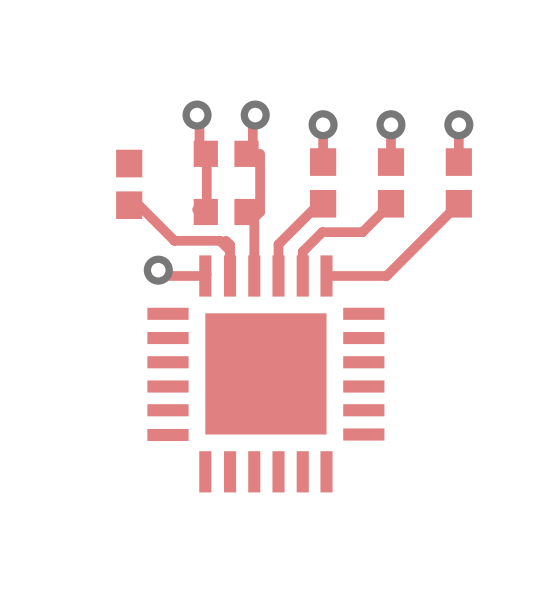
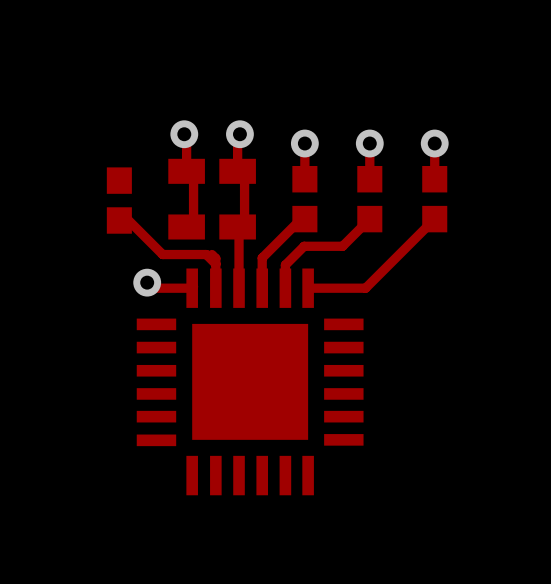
part footprint: [193, 140, 259, 167] -> [168, 158, 256, 184]
part footprint: [193, 198, 259, 226] -> [168, 214, 256, 240]

